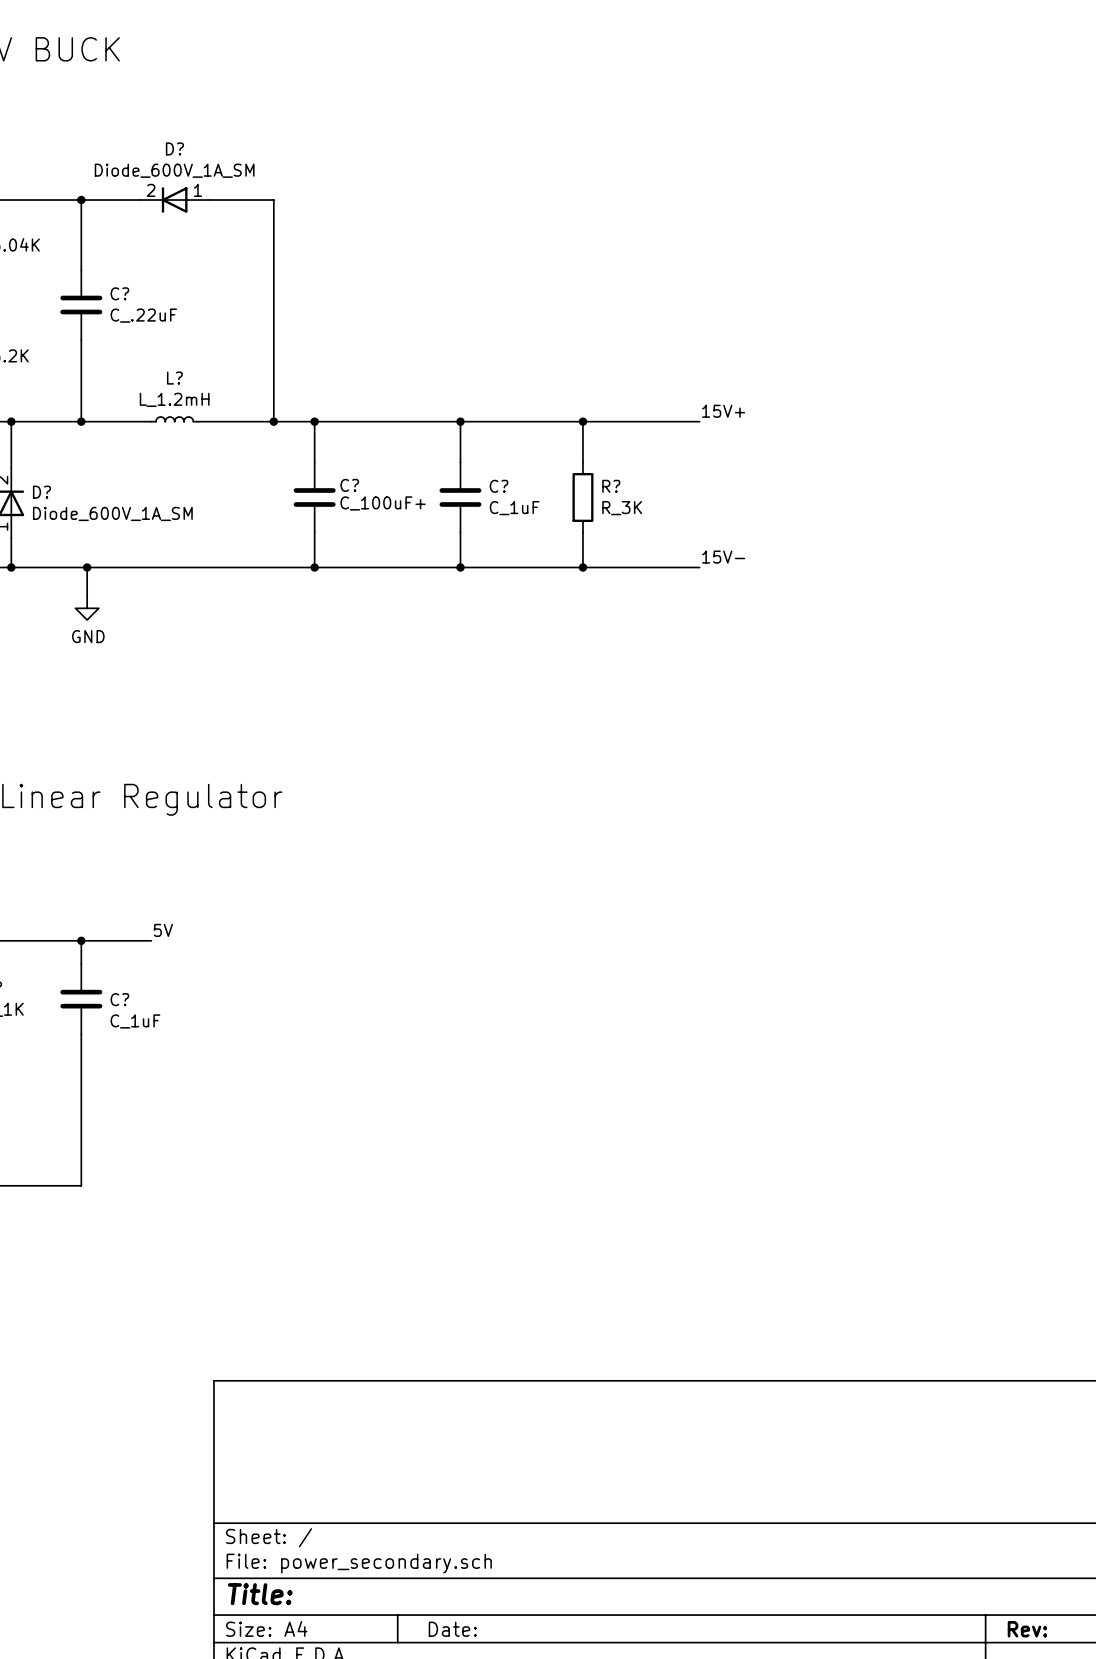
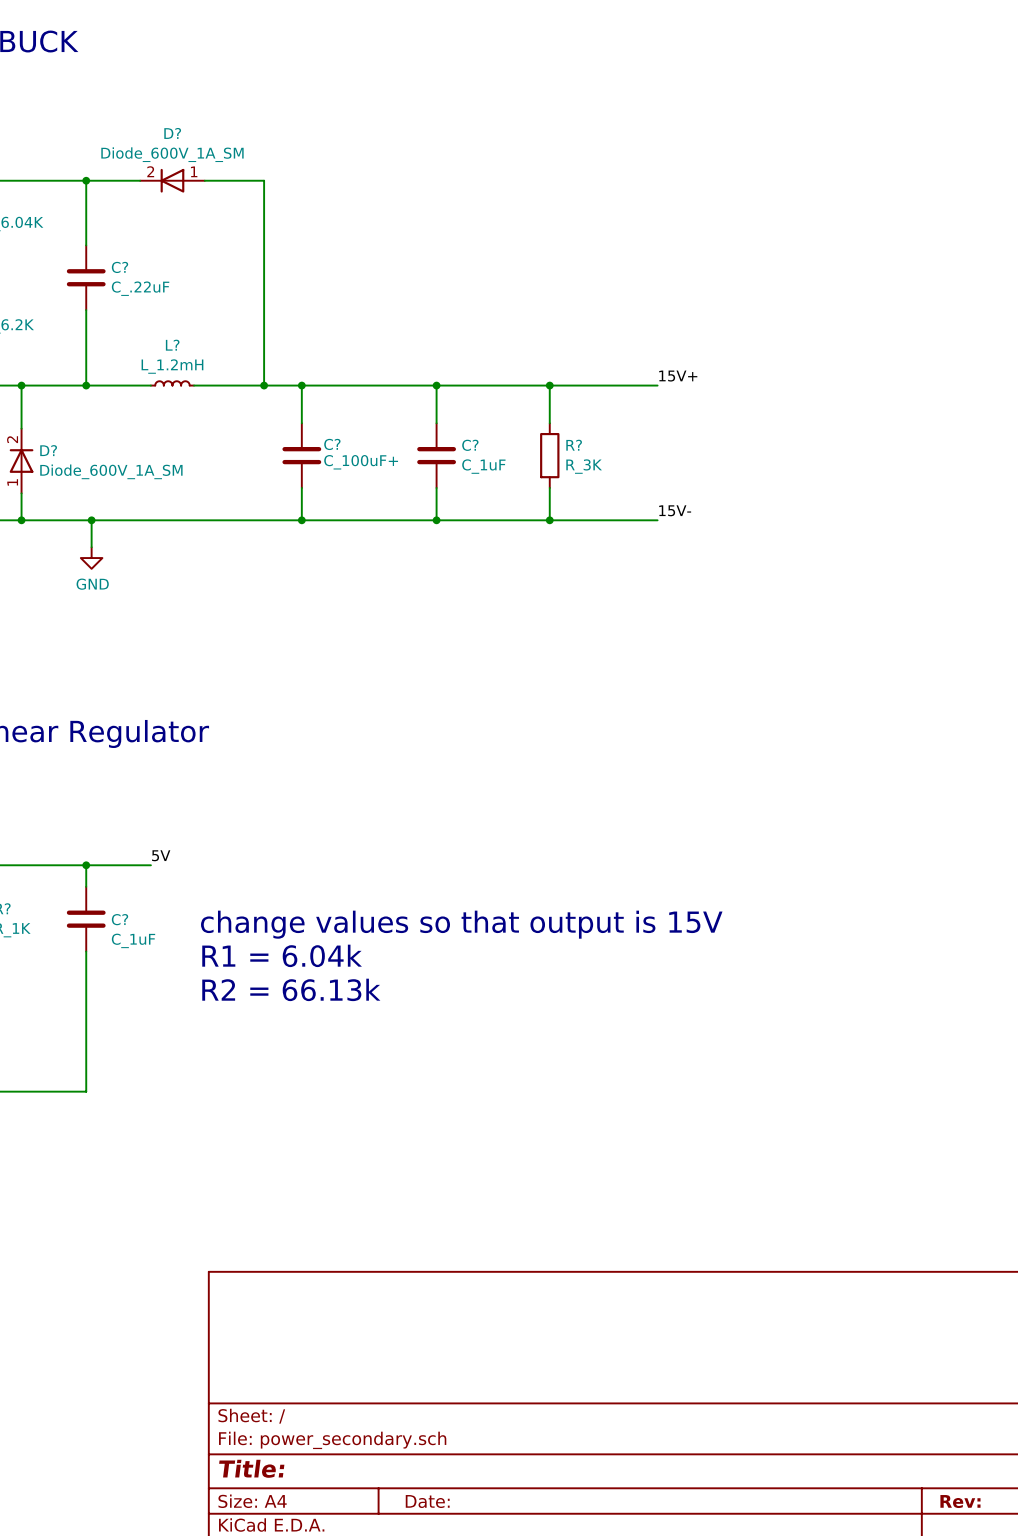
text: none -> change values so that output is 15V (461, 924)
text: none -> R1 = 6.04k (282, 955)
text: none -> R2 = 66.13k (291, 989)

